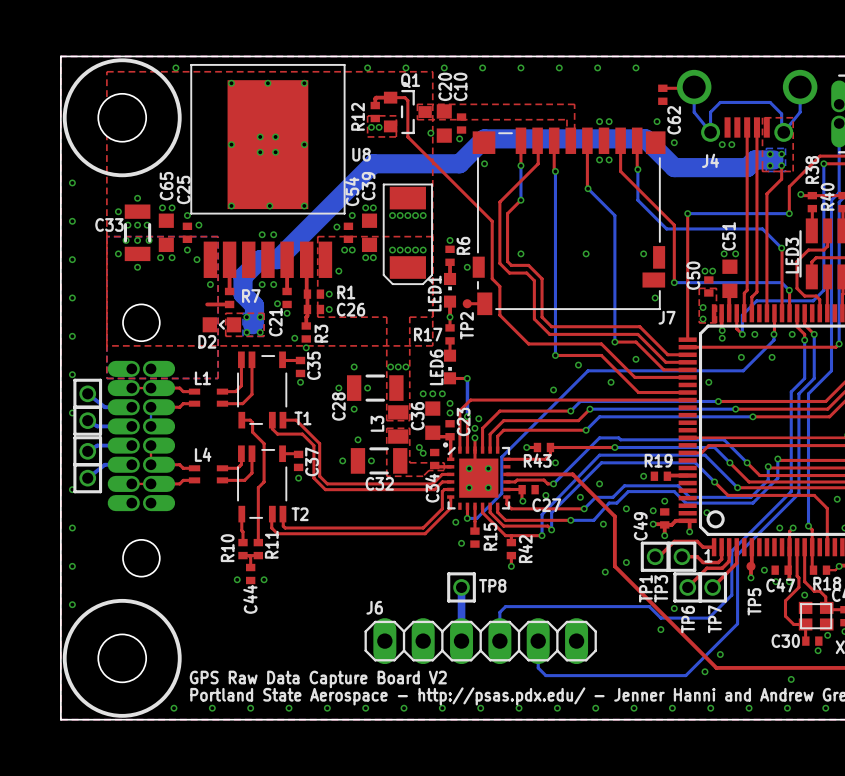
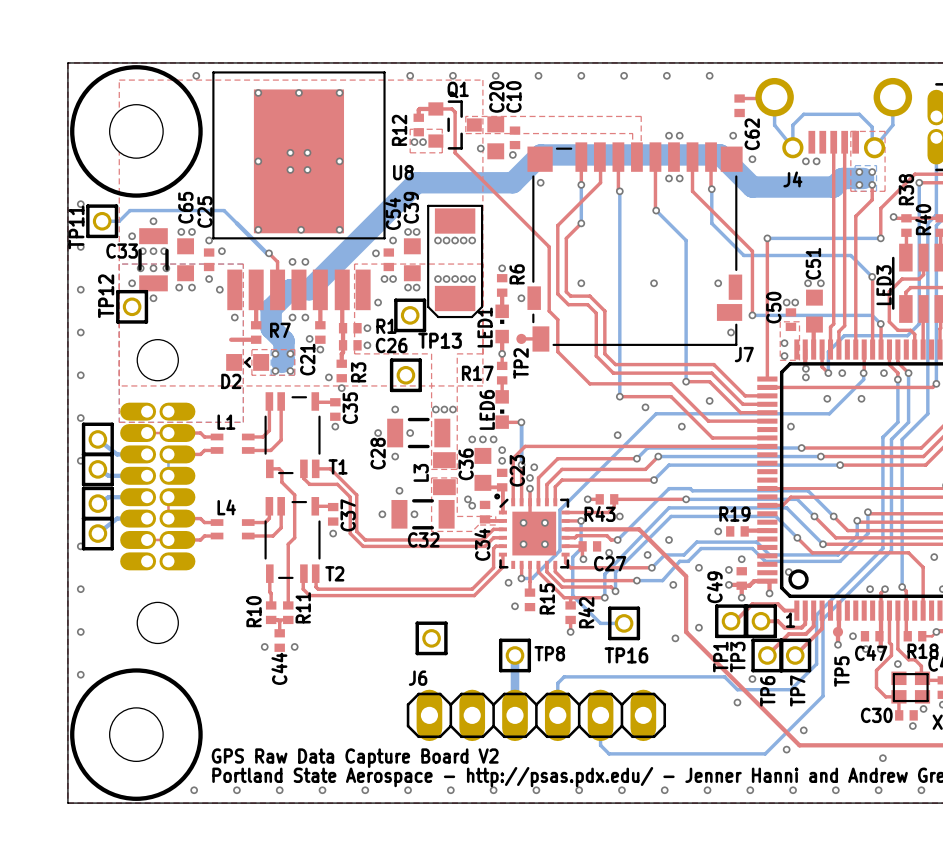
bottom track: none -> (102, 221) (119, 221) (129, 210) (224, 210) (269, 253)
TP11: none -> (102, 221)
top track: none -> (269, 253) (277, 261) (277, 289)
via: none -> (269, 253)
TP12: none -> (132, 306)
TP13: none -> (410, 315)
part: none -> (405, 375)
top track: none -> (565, 520) (581, 520)
bottom track: none -> (581, 520) (581, 548) (572, 557) (572, 595) (600, 623) (624, 623)
via: none -> (581, 520)
TP16: none -> (624, 623)
part: none -> (431, 638)

